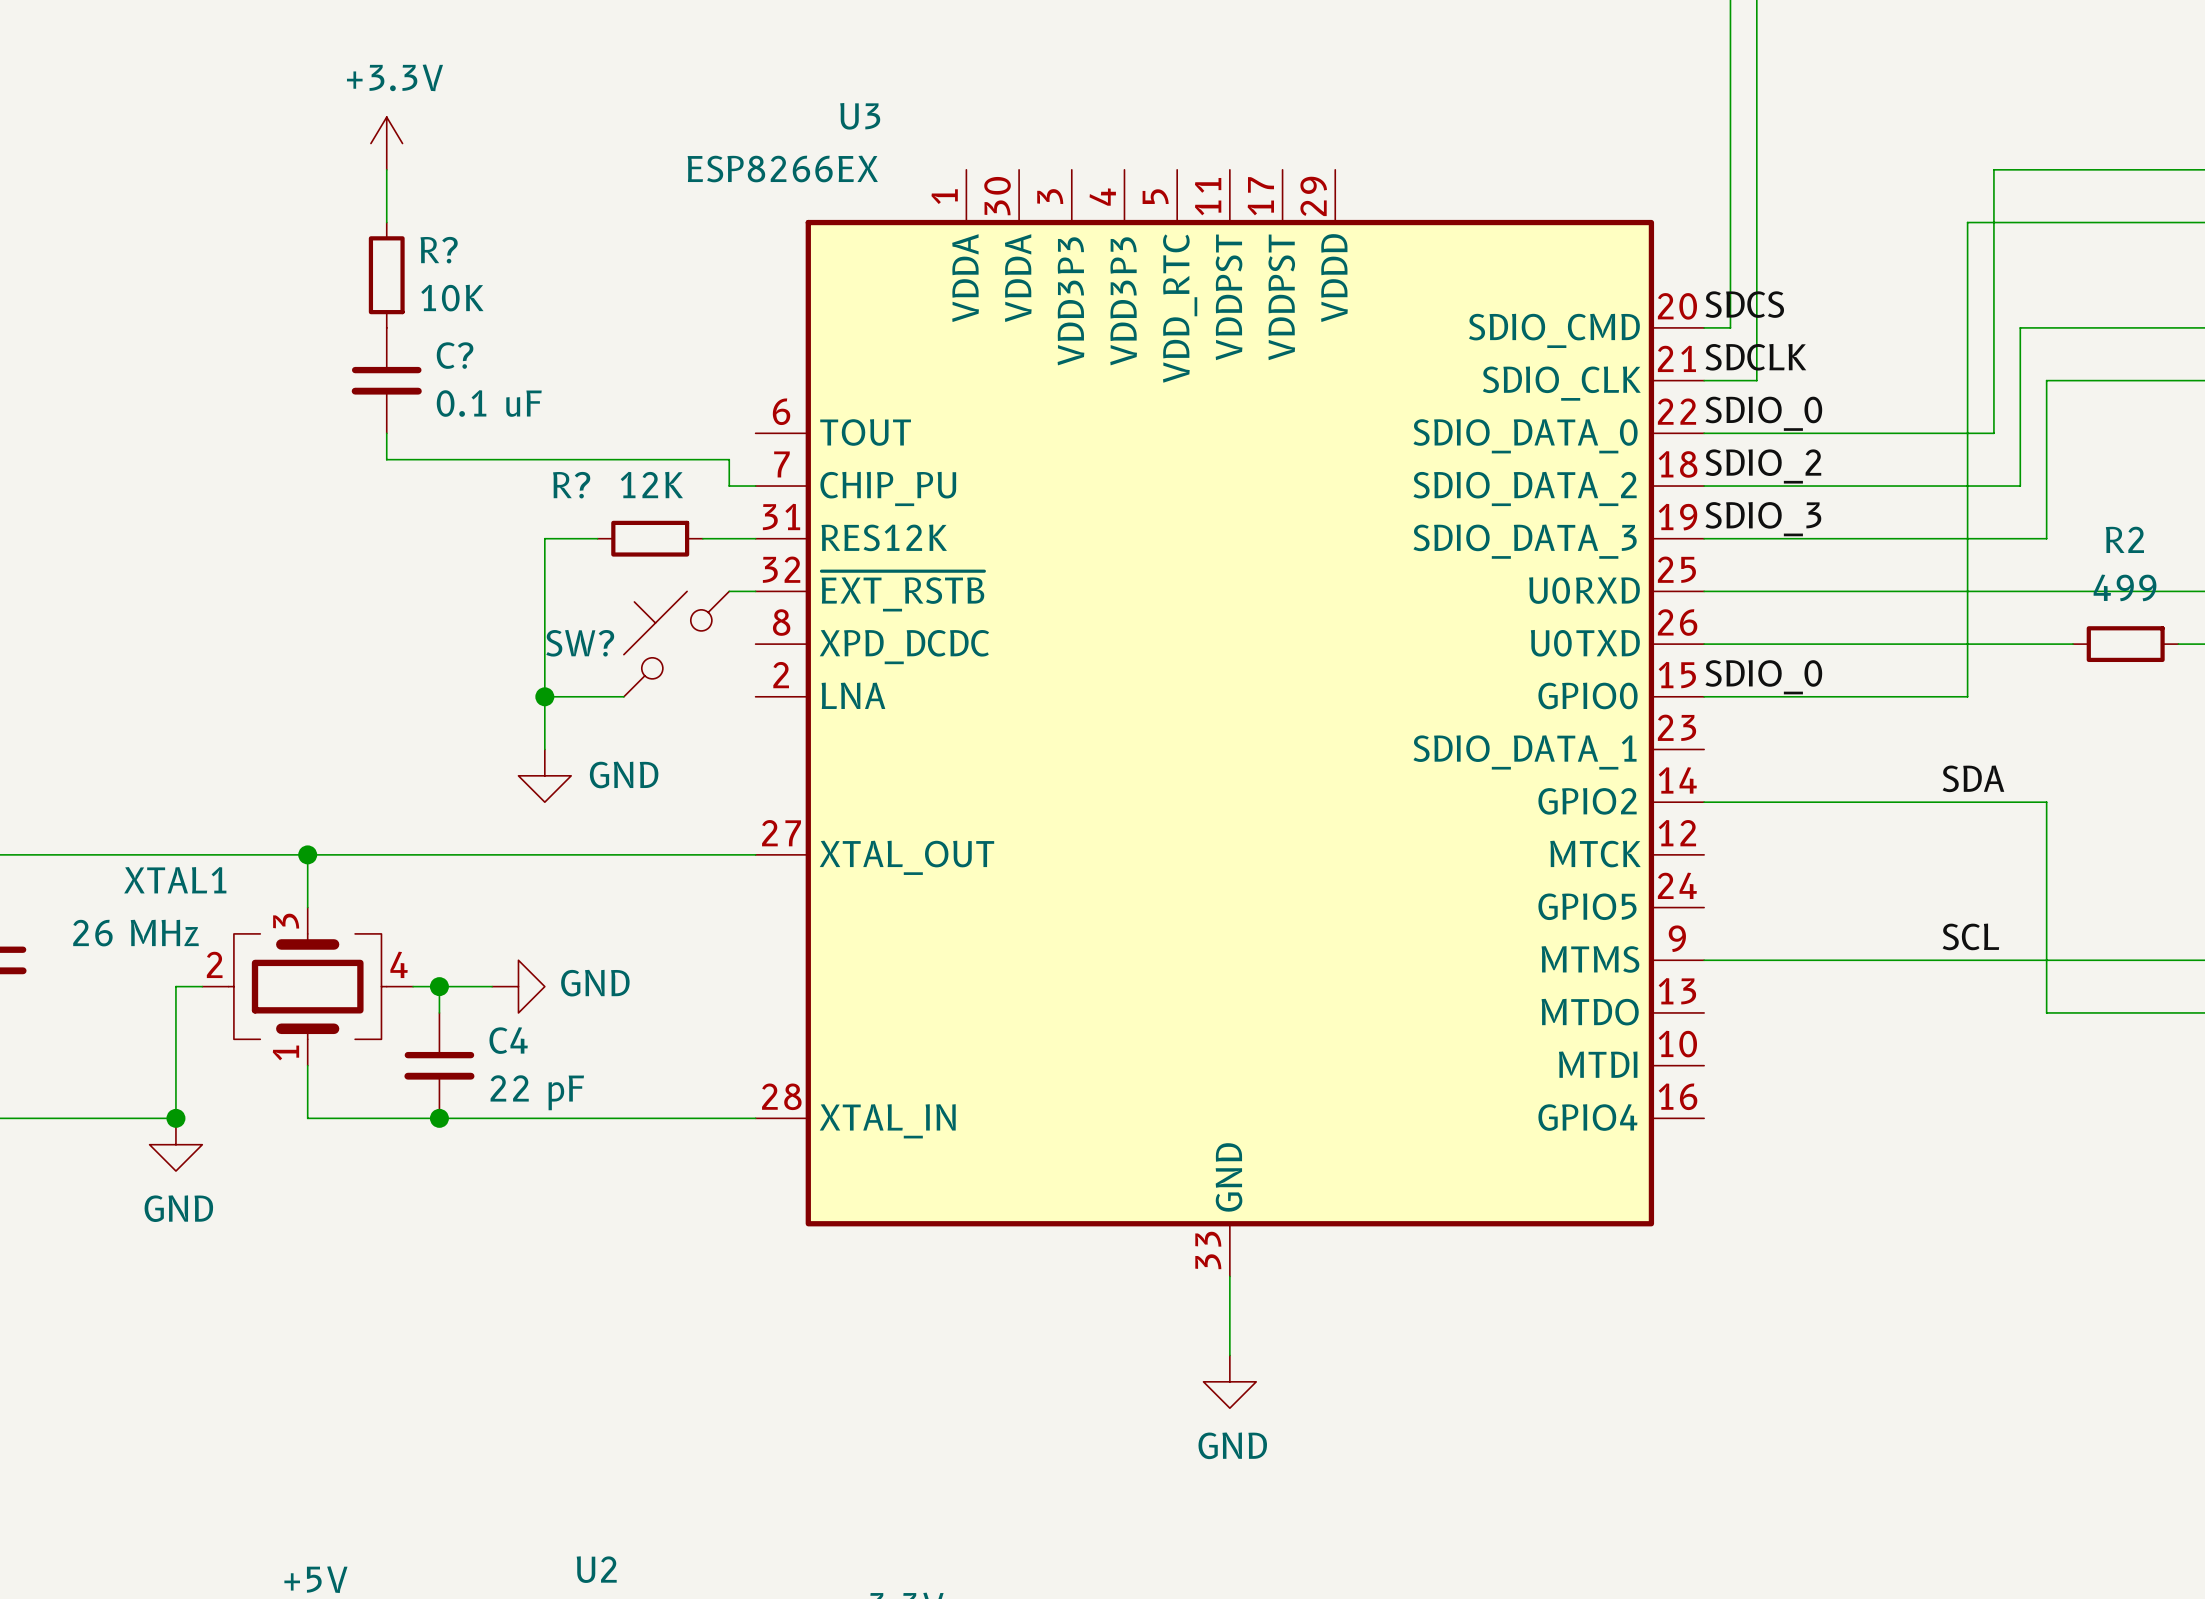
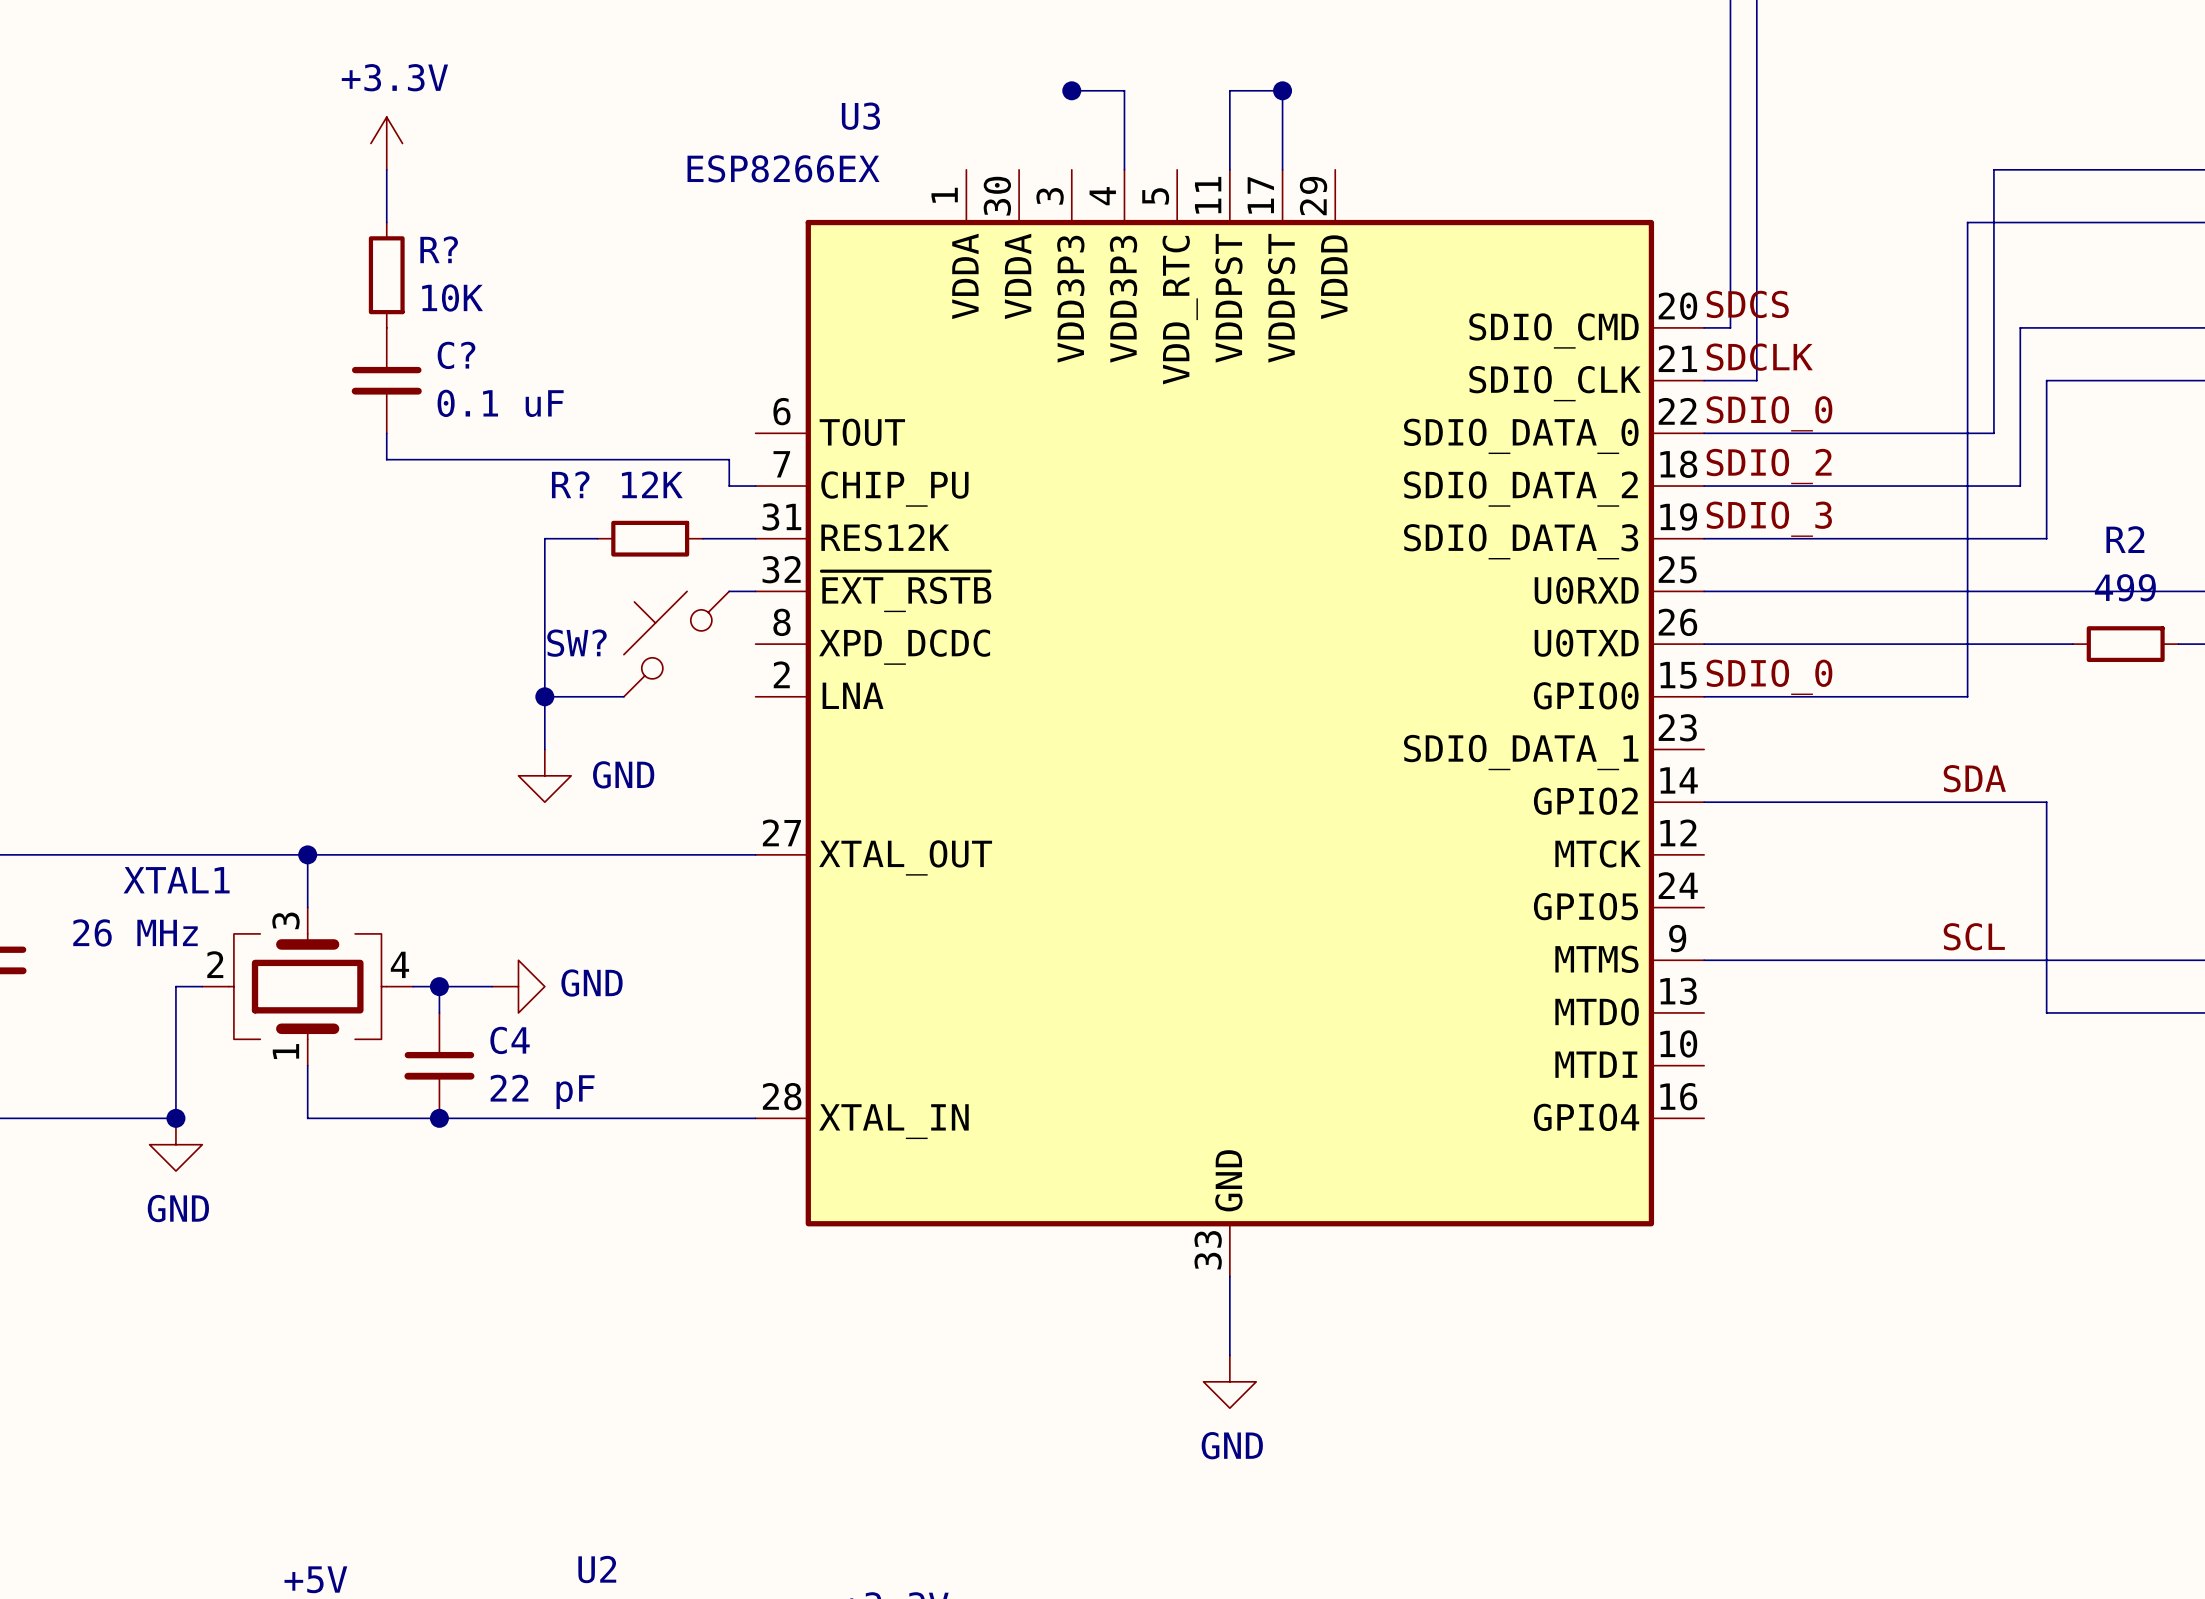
wire: none -> (1071, 90) (1124, 90) (1124, 169)
junction: none -> (1071, 90)
junction: none -> (1282, 90)
wire: none -> (1229, 169) (1229, 90) (1282, 90) (1282, 169)

